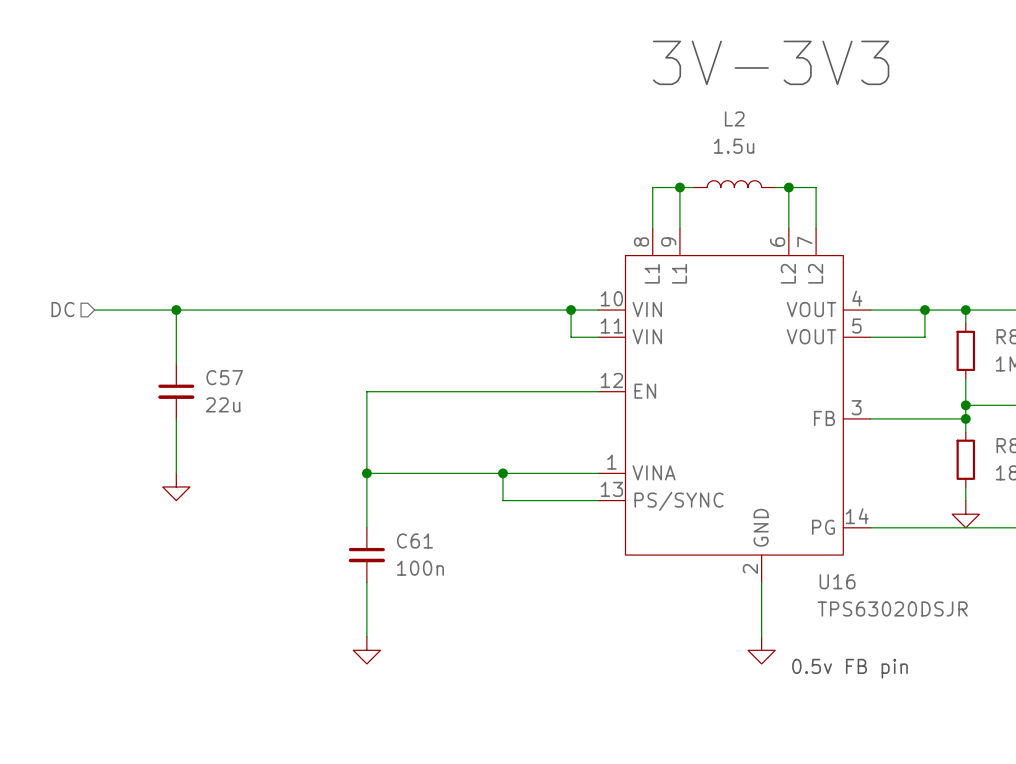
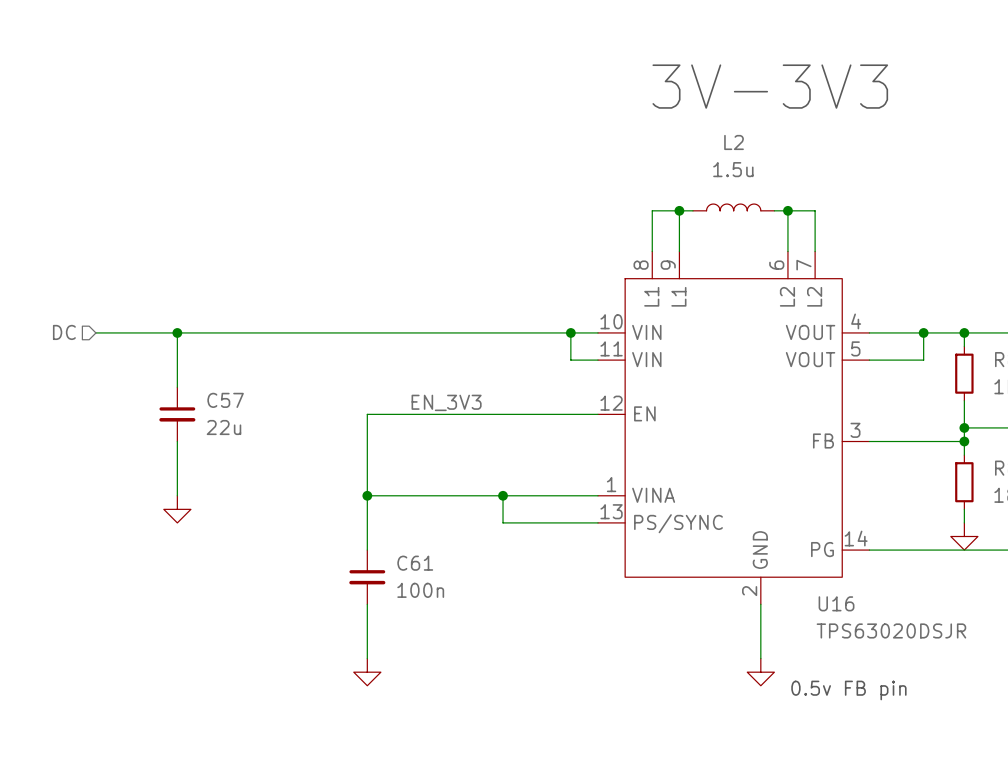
label: none -> EN_3V3 (446, 402)

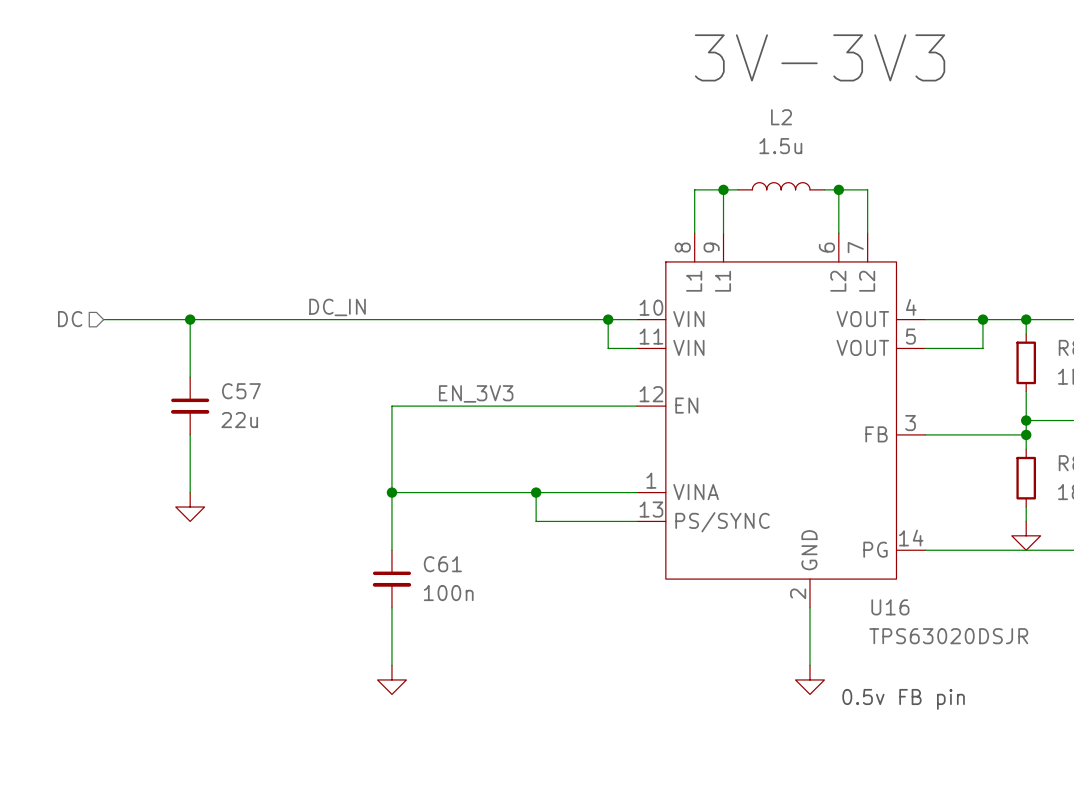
label: none -> DC_IN (337, 307)

